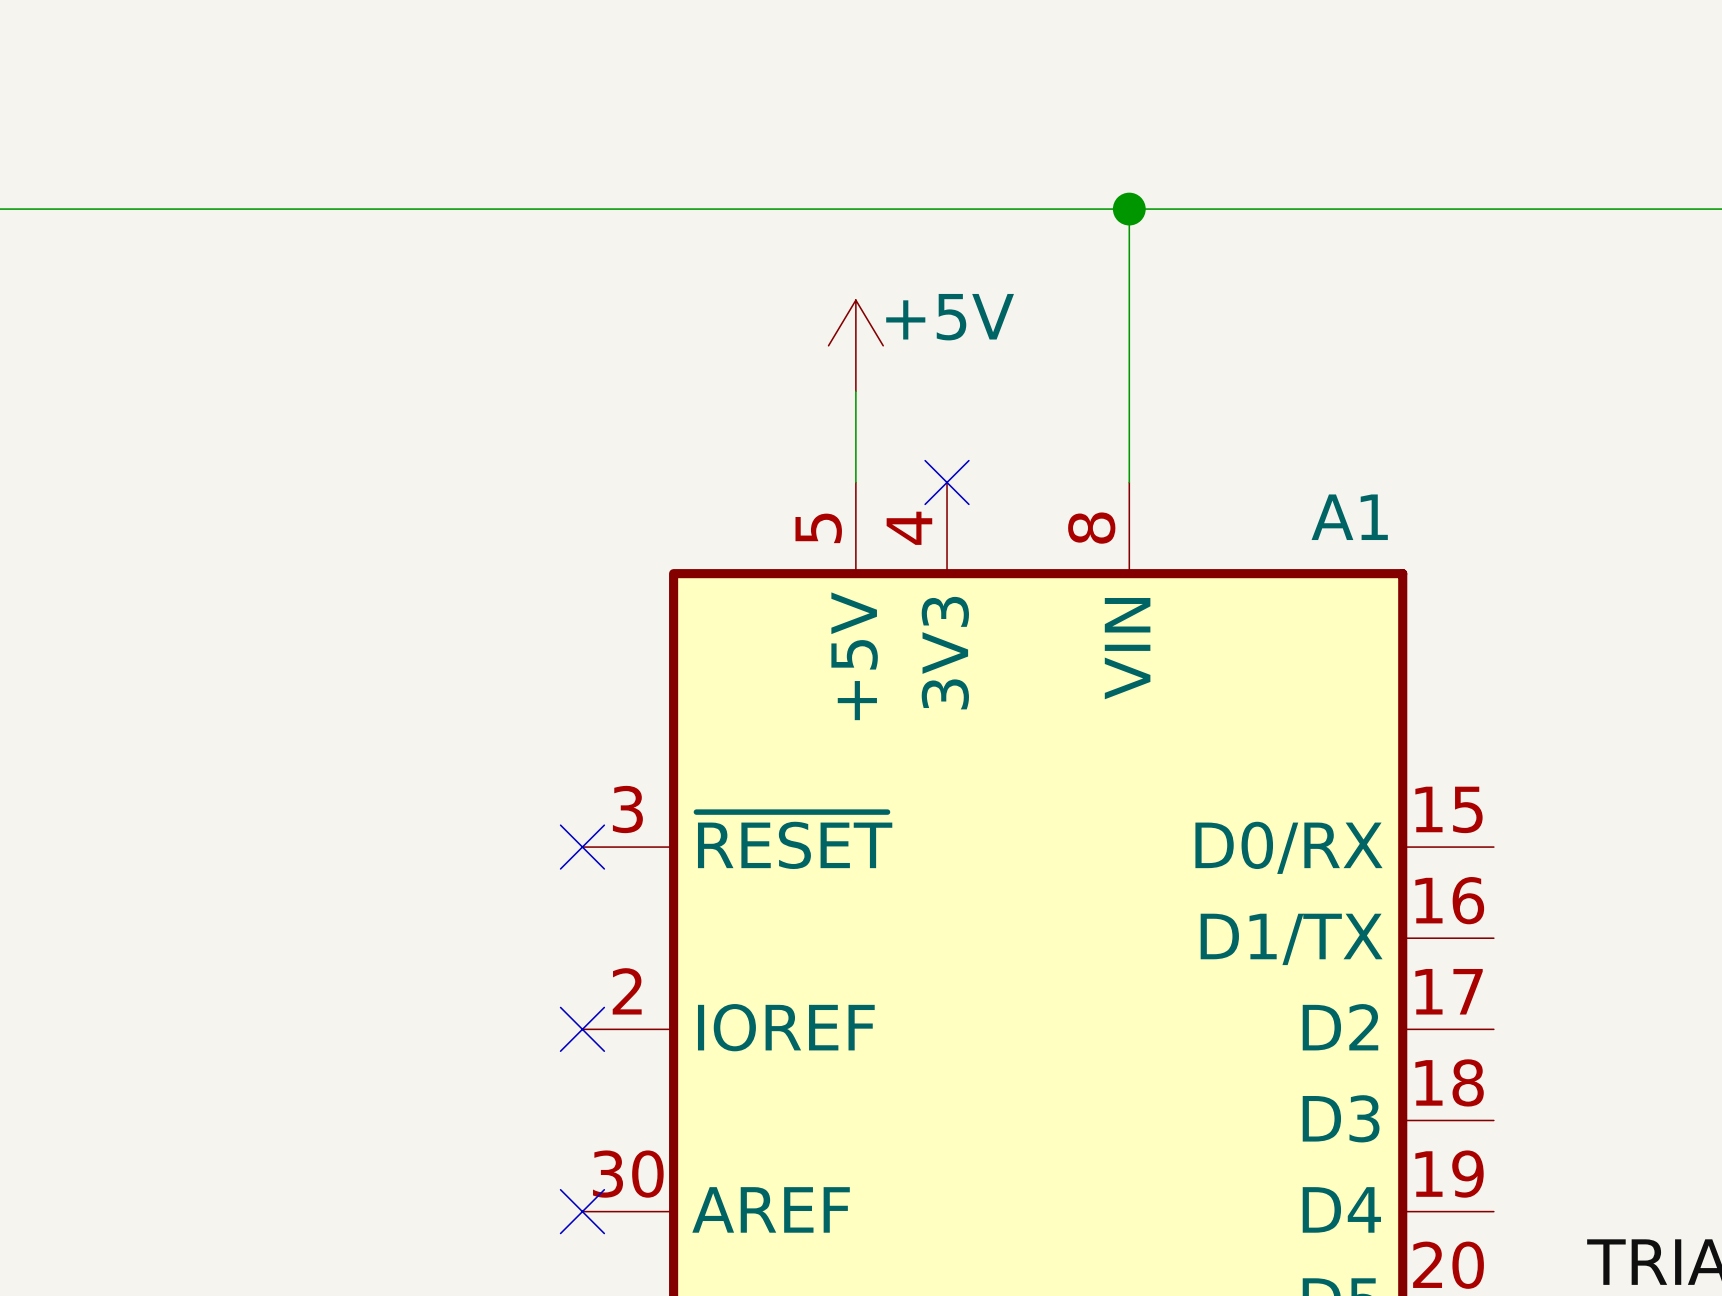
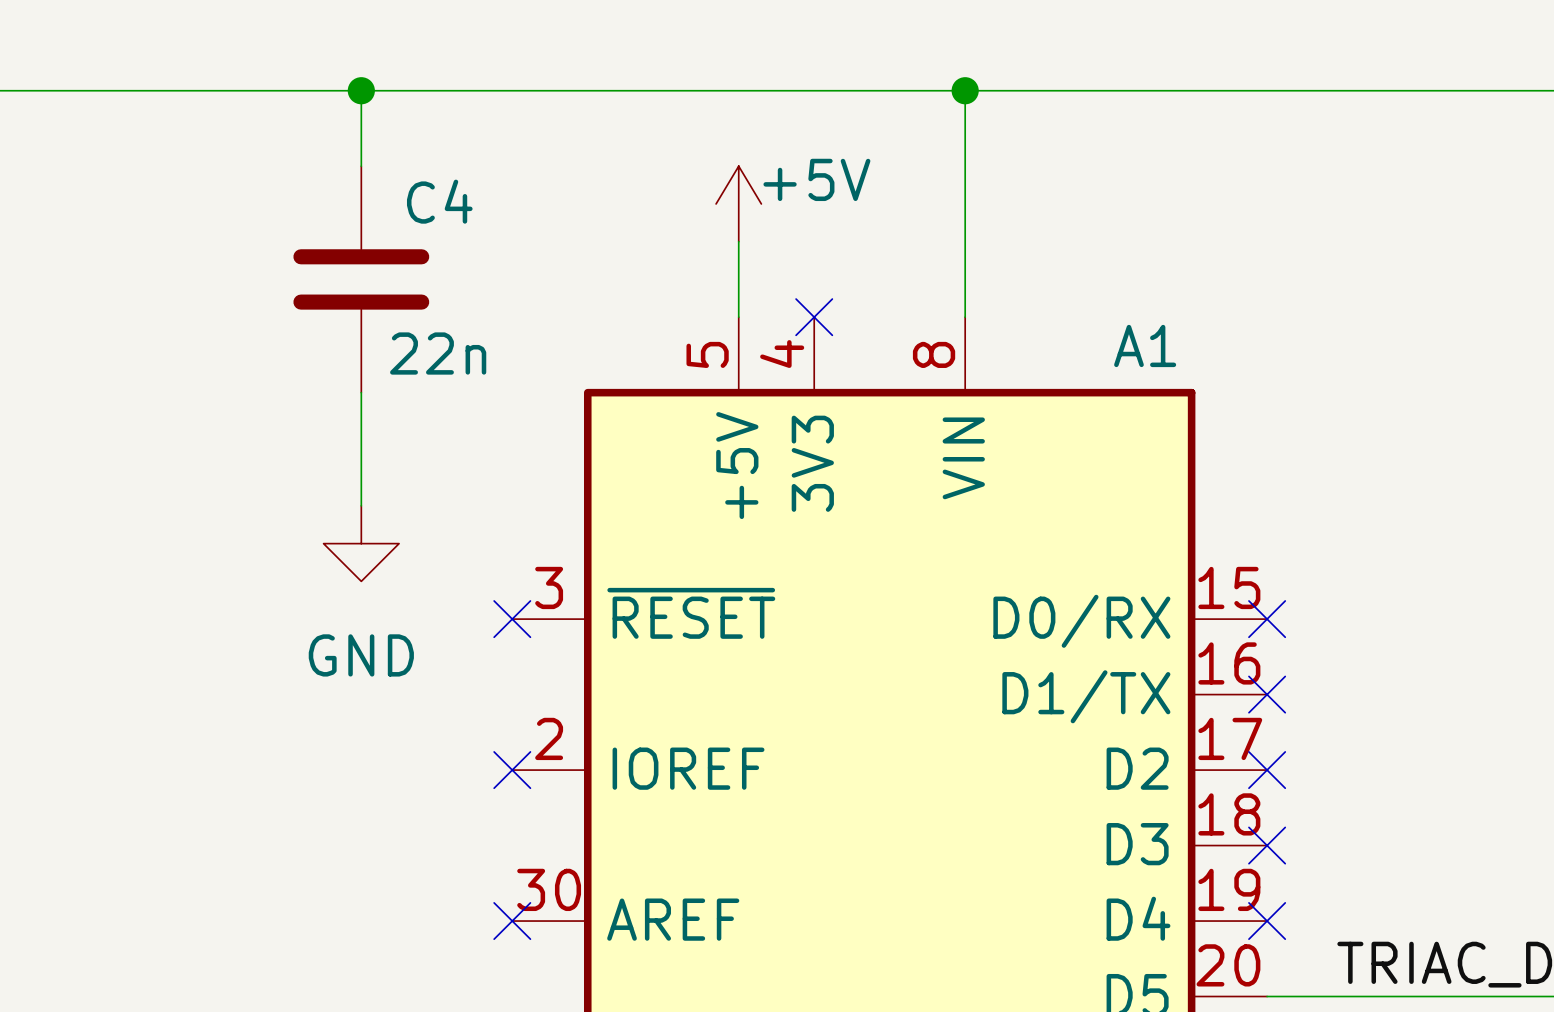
wire: none -> (361, 90) (361, 166)
junction: none -> (361, 90)
C4: none -> 22n (361, 279)
wire: none -> (361, 392) (361, 505)
power symbol: none -> GND (361, 543)
no-connect mark: none -> (1267, 619)
no-connect mark: none -> (1267, 694)
no-connect mark: none -> (1267, 770)
no-connect mark: none -> (1267, 845)
no-connect mark: none -> (1267, 921)

